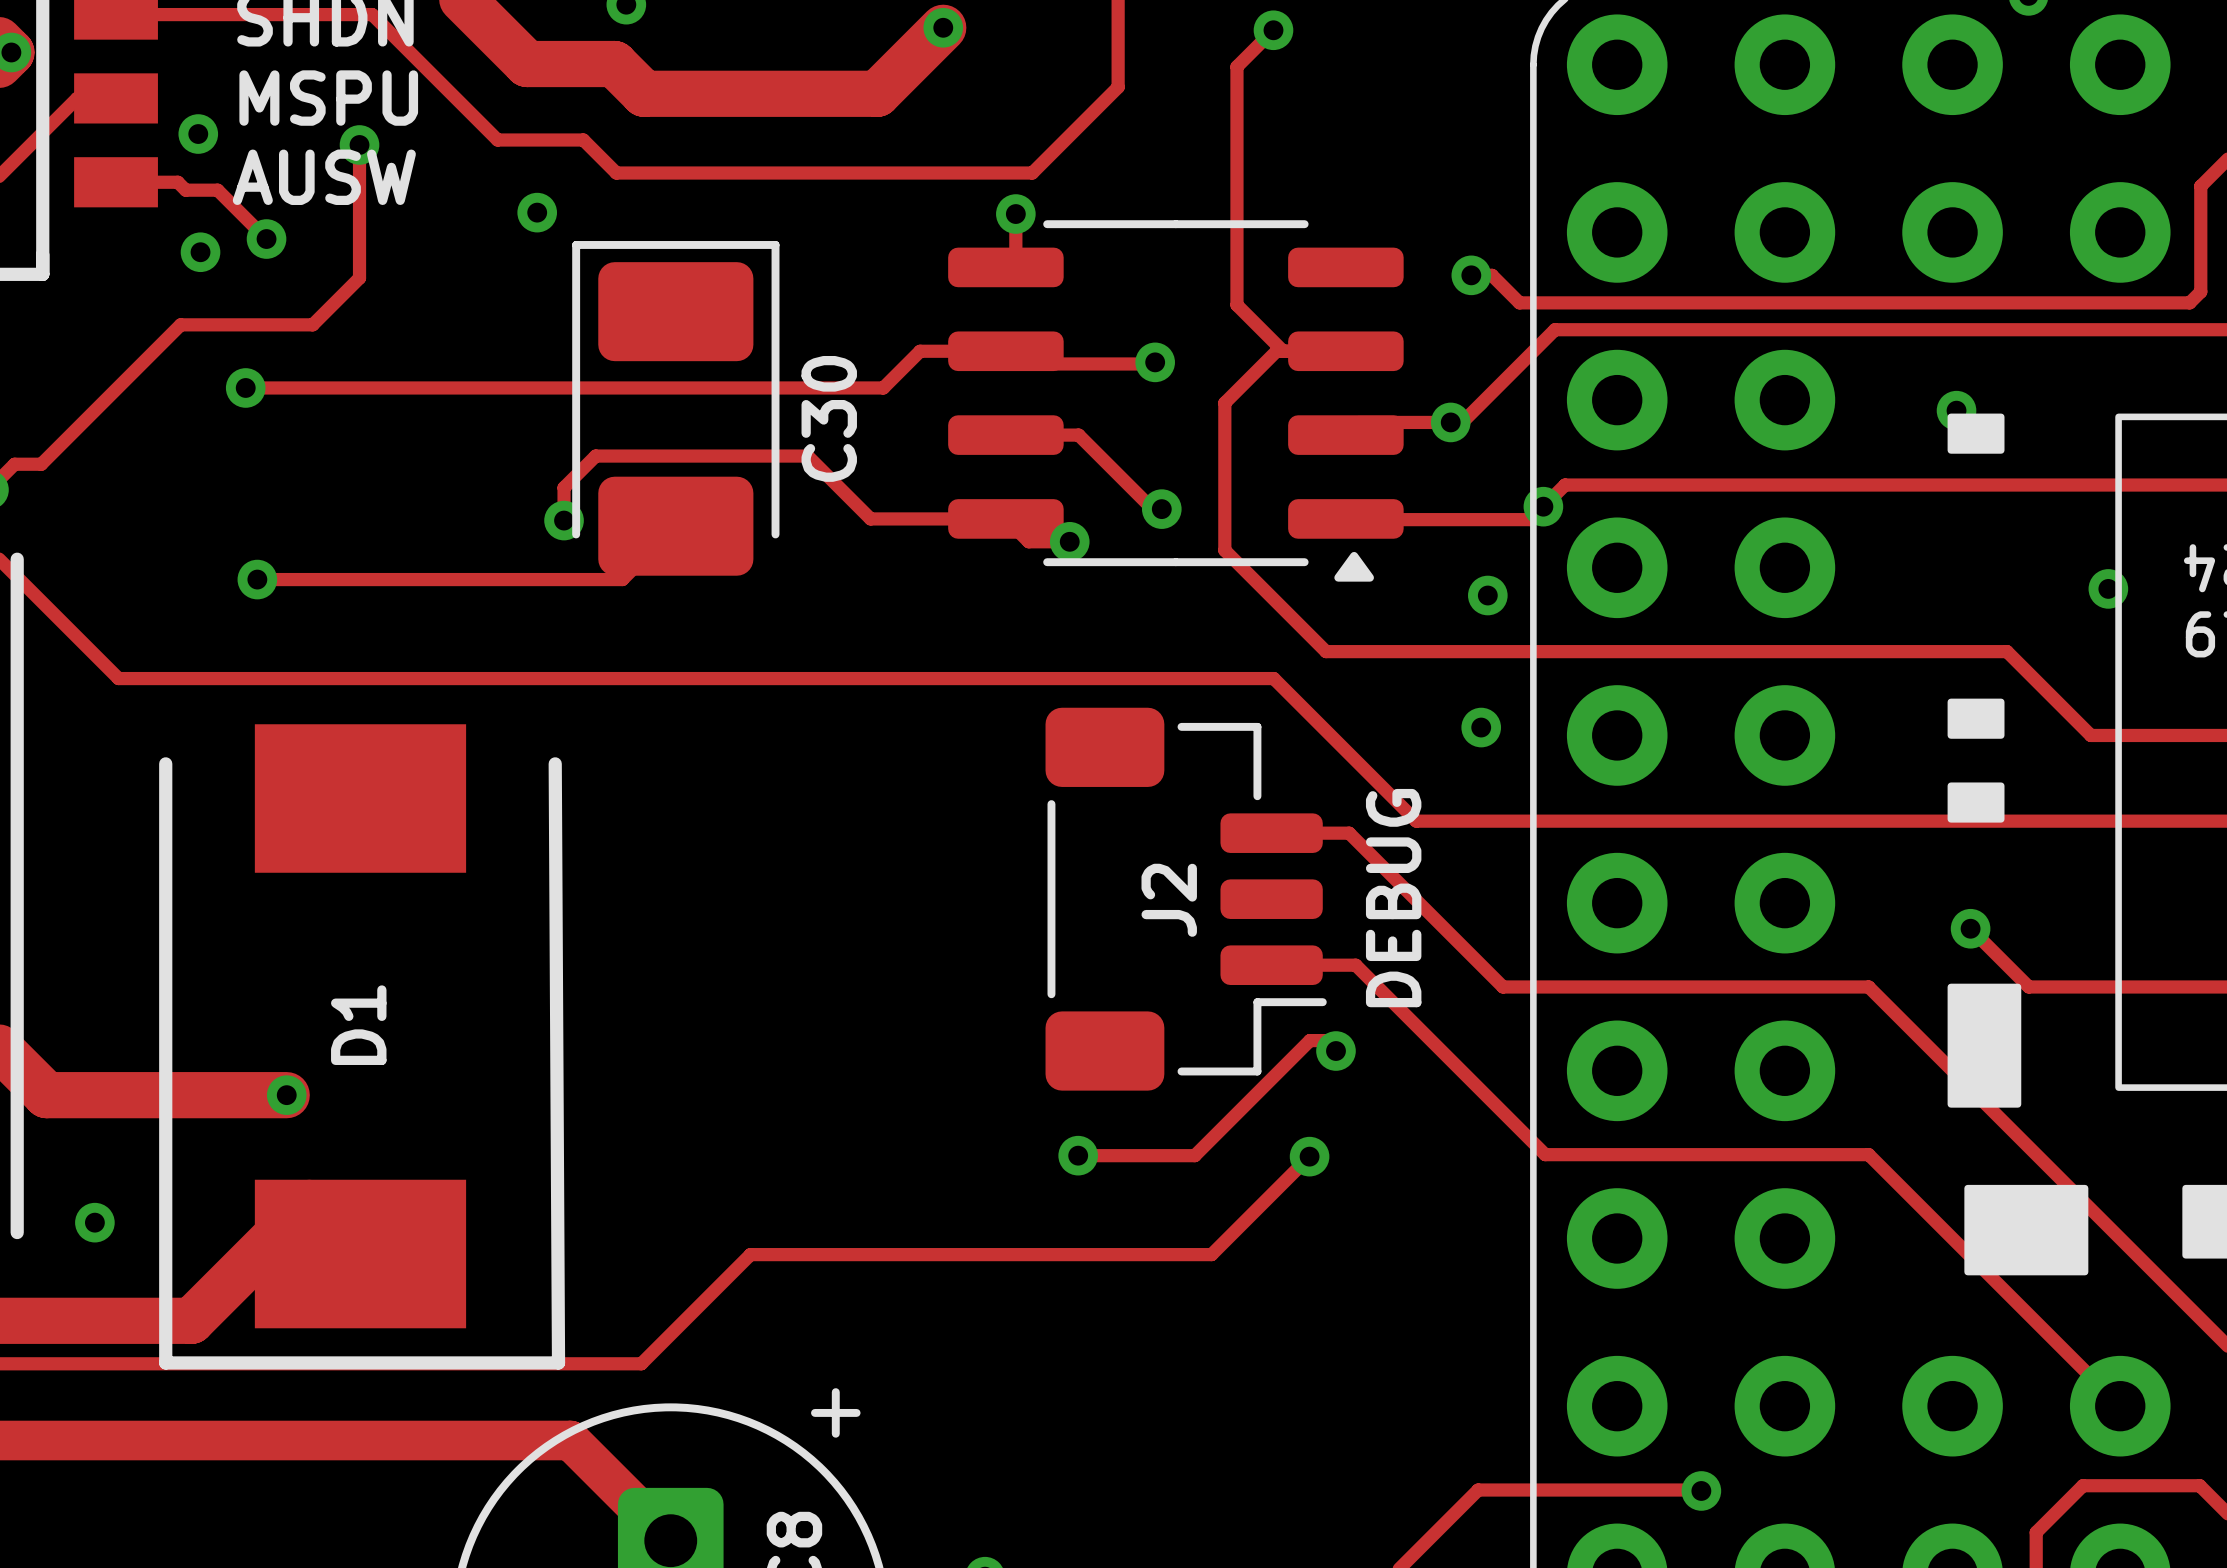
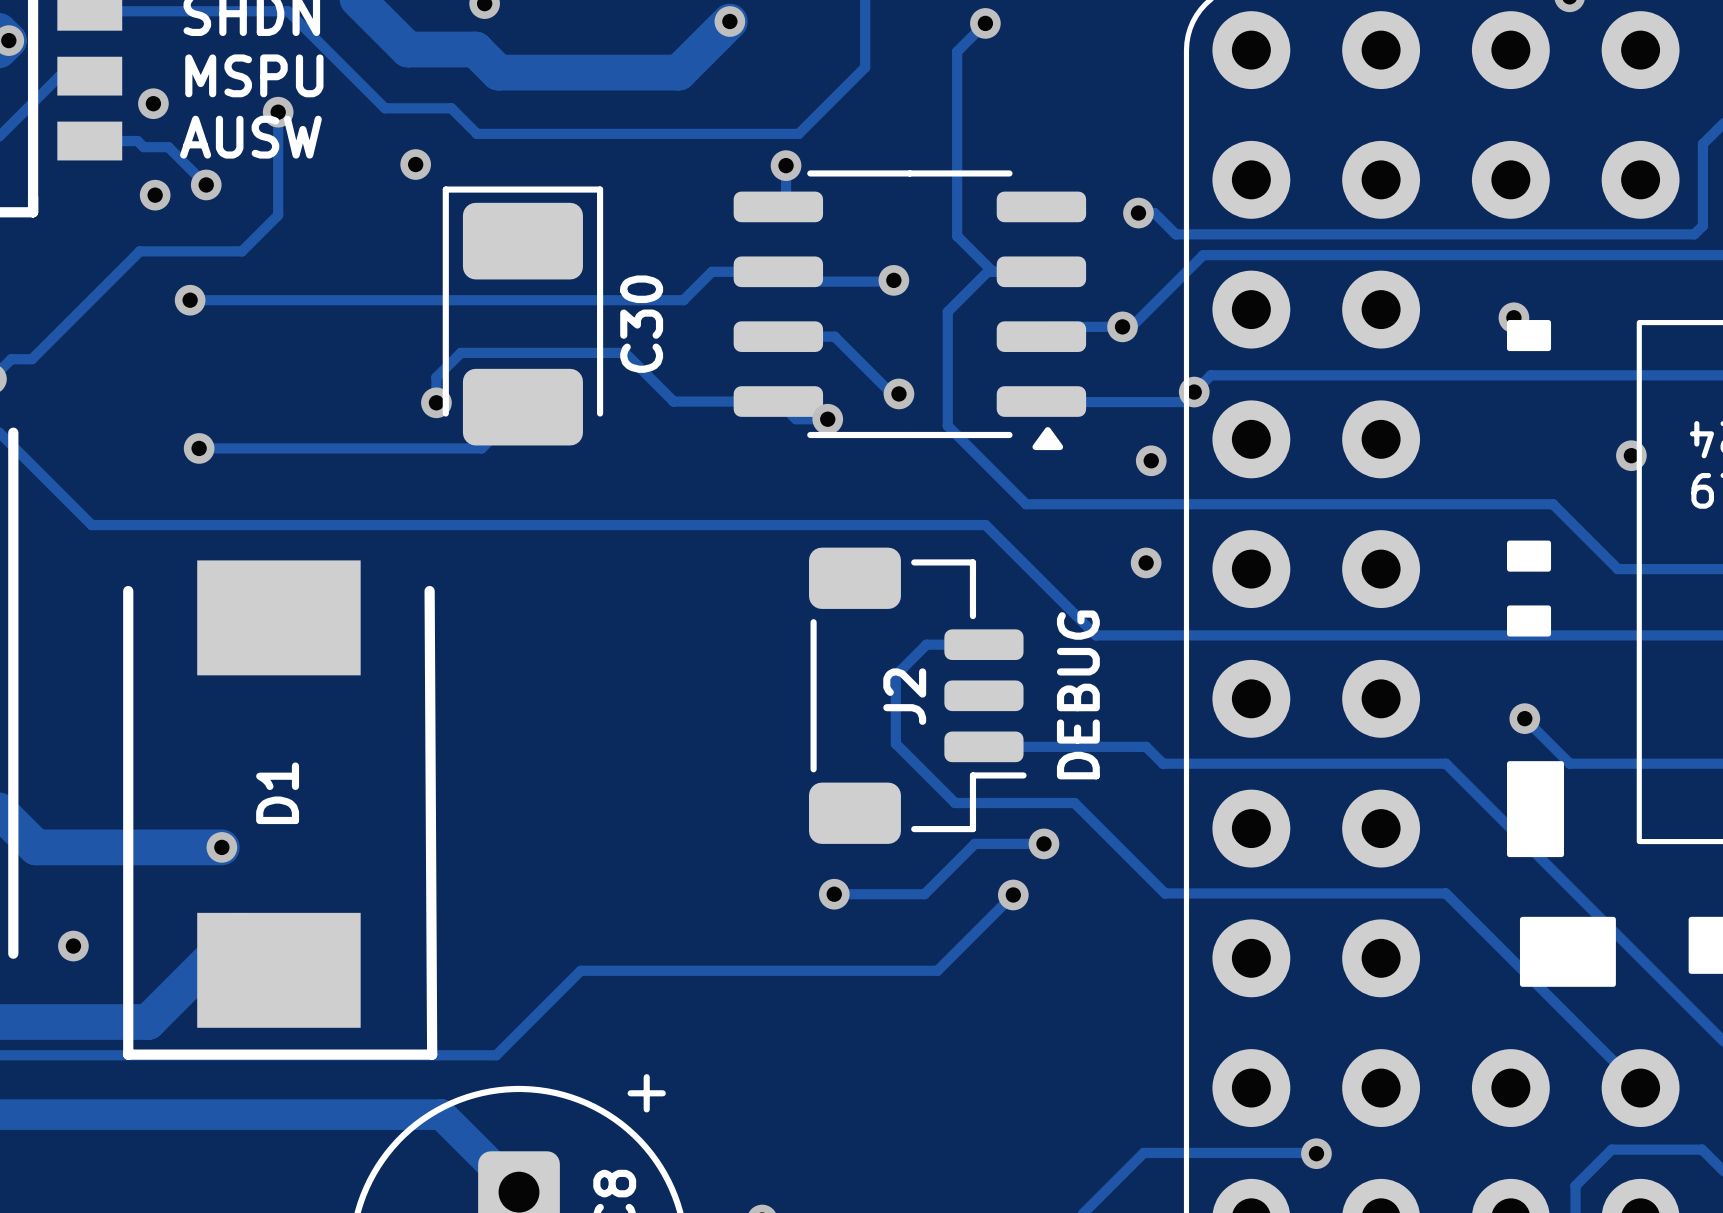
track: (1271, 833) (1349, 833) (1481, 965) -> (1049, 746) (1146, 746)
track: (1355, 965) (1545, 1154) -> (983, 644) (926, 644) (895, 675) (895, 743) (955, 803) (1074, 803) (1165, 893) (1195, 893)
track: (1335, 1051) (1325, 1040) (1309, 1040) (1259, 1090) -> (1043, 843) (974, 843)
via position: (1335, 1051) -> (1043, 843)

